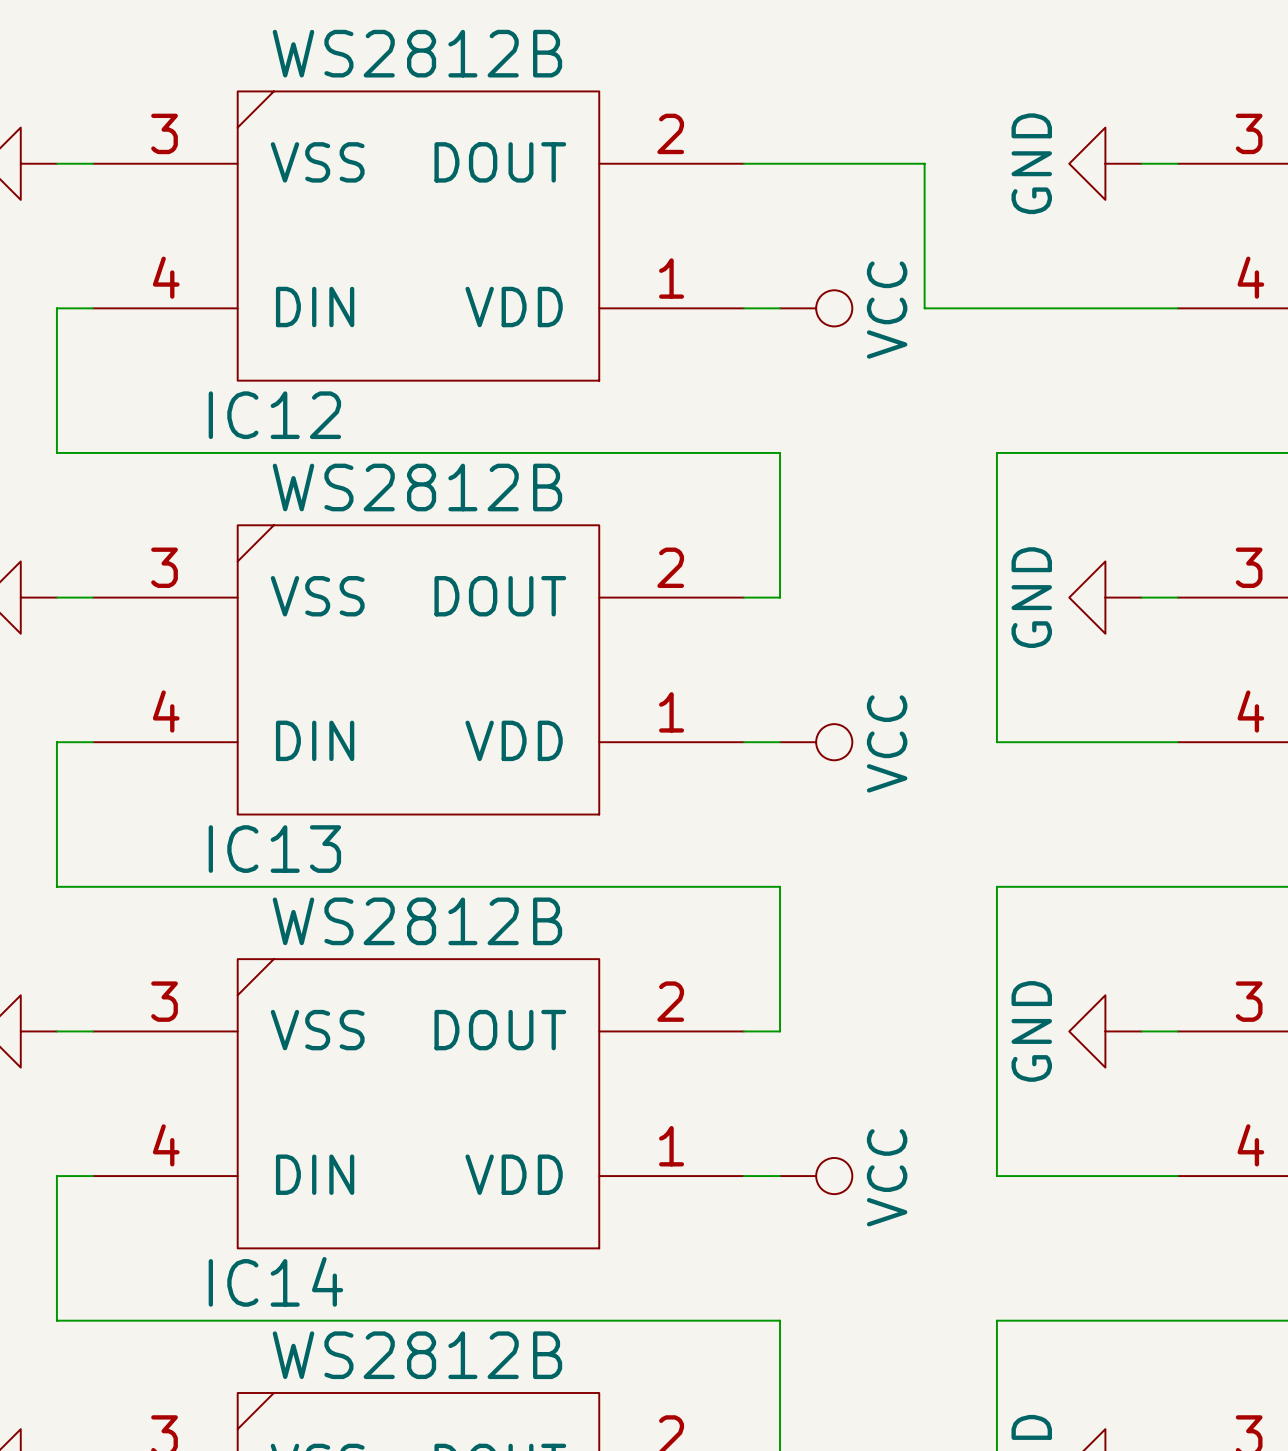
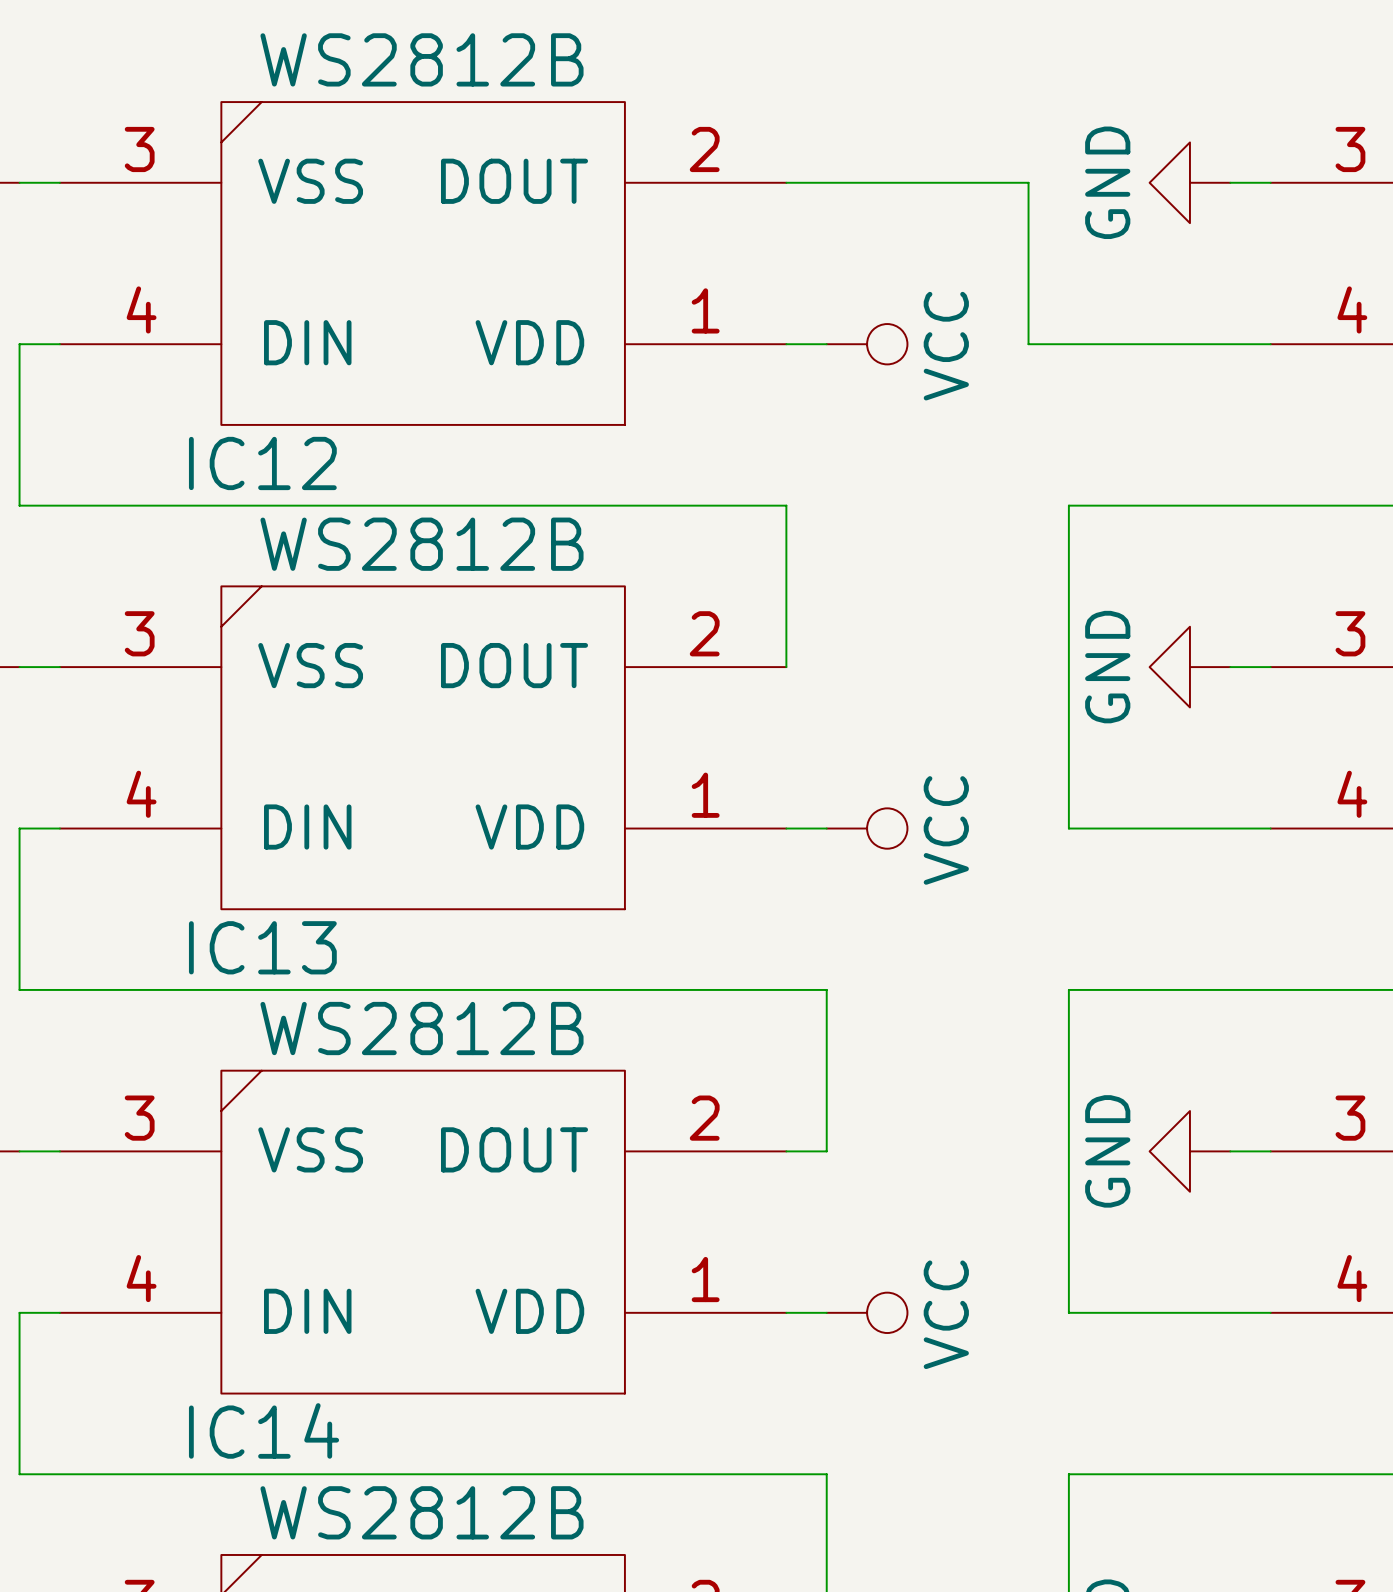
wire: (924, 163) (924, 308) (960, 308) -> (988, 182) (1028, 182) (1028, 344)
wire: (743, 452) (780, 452) (780, 597) (743, 597) -> (786, 505) (786, 667)

